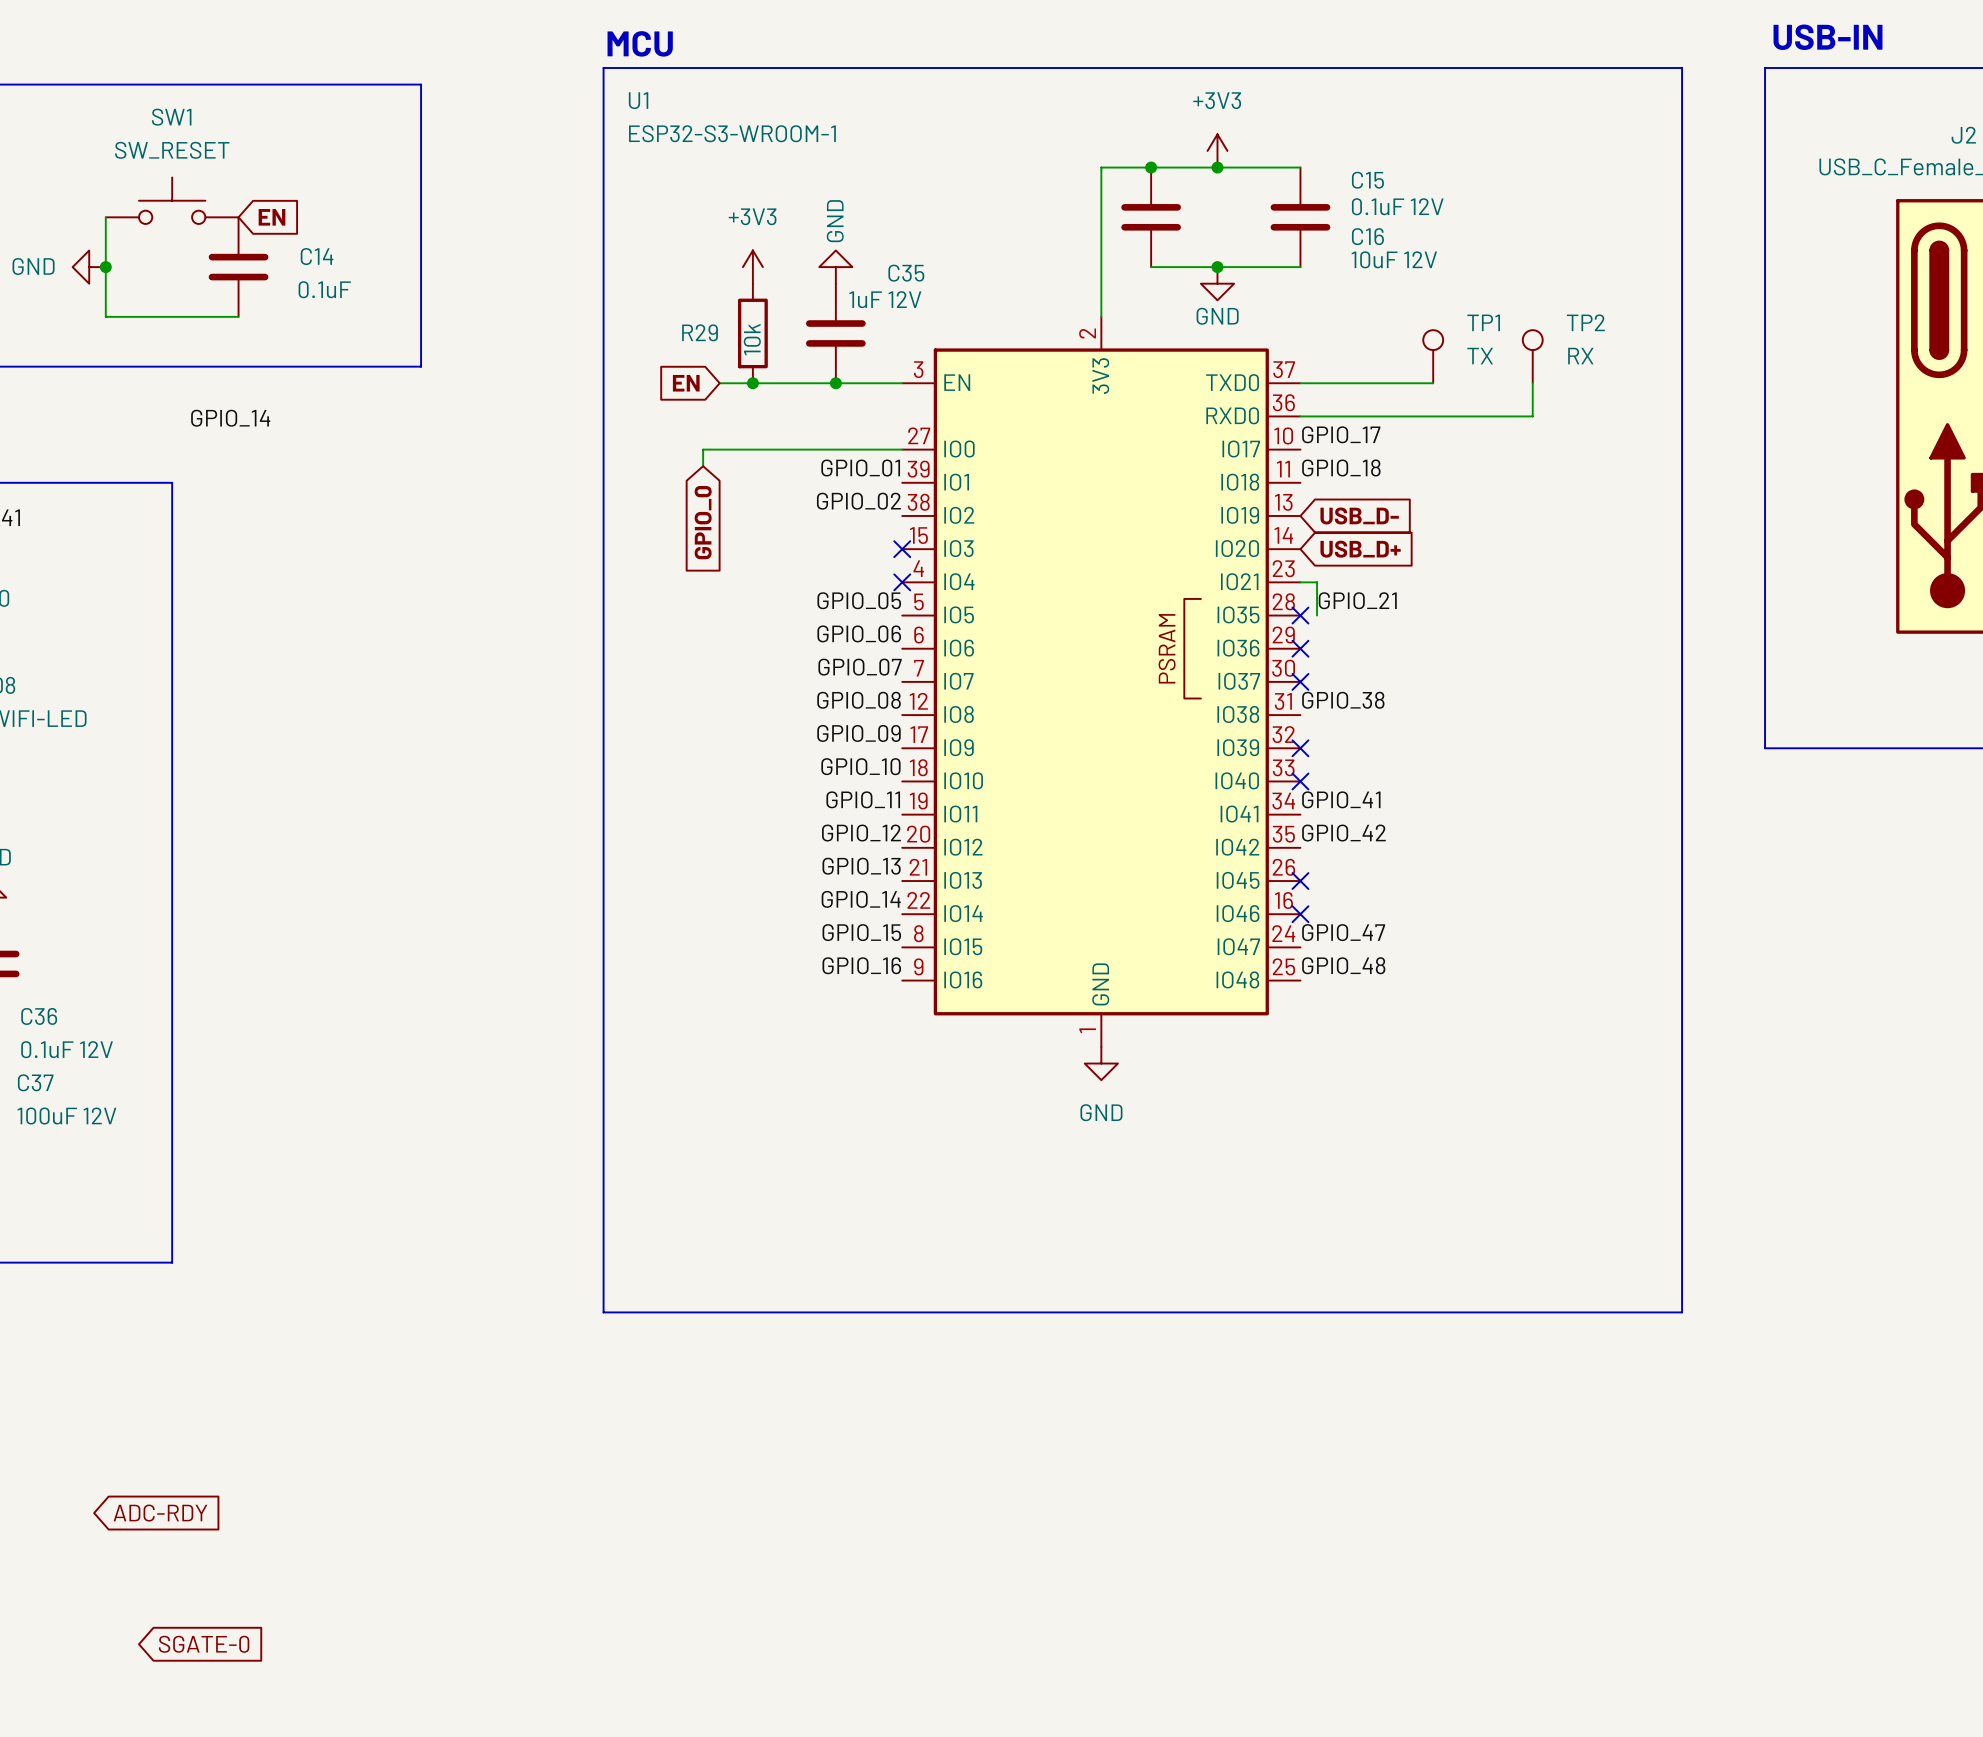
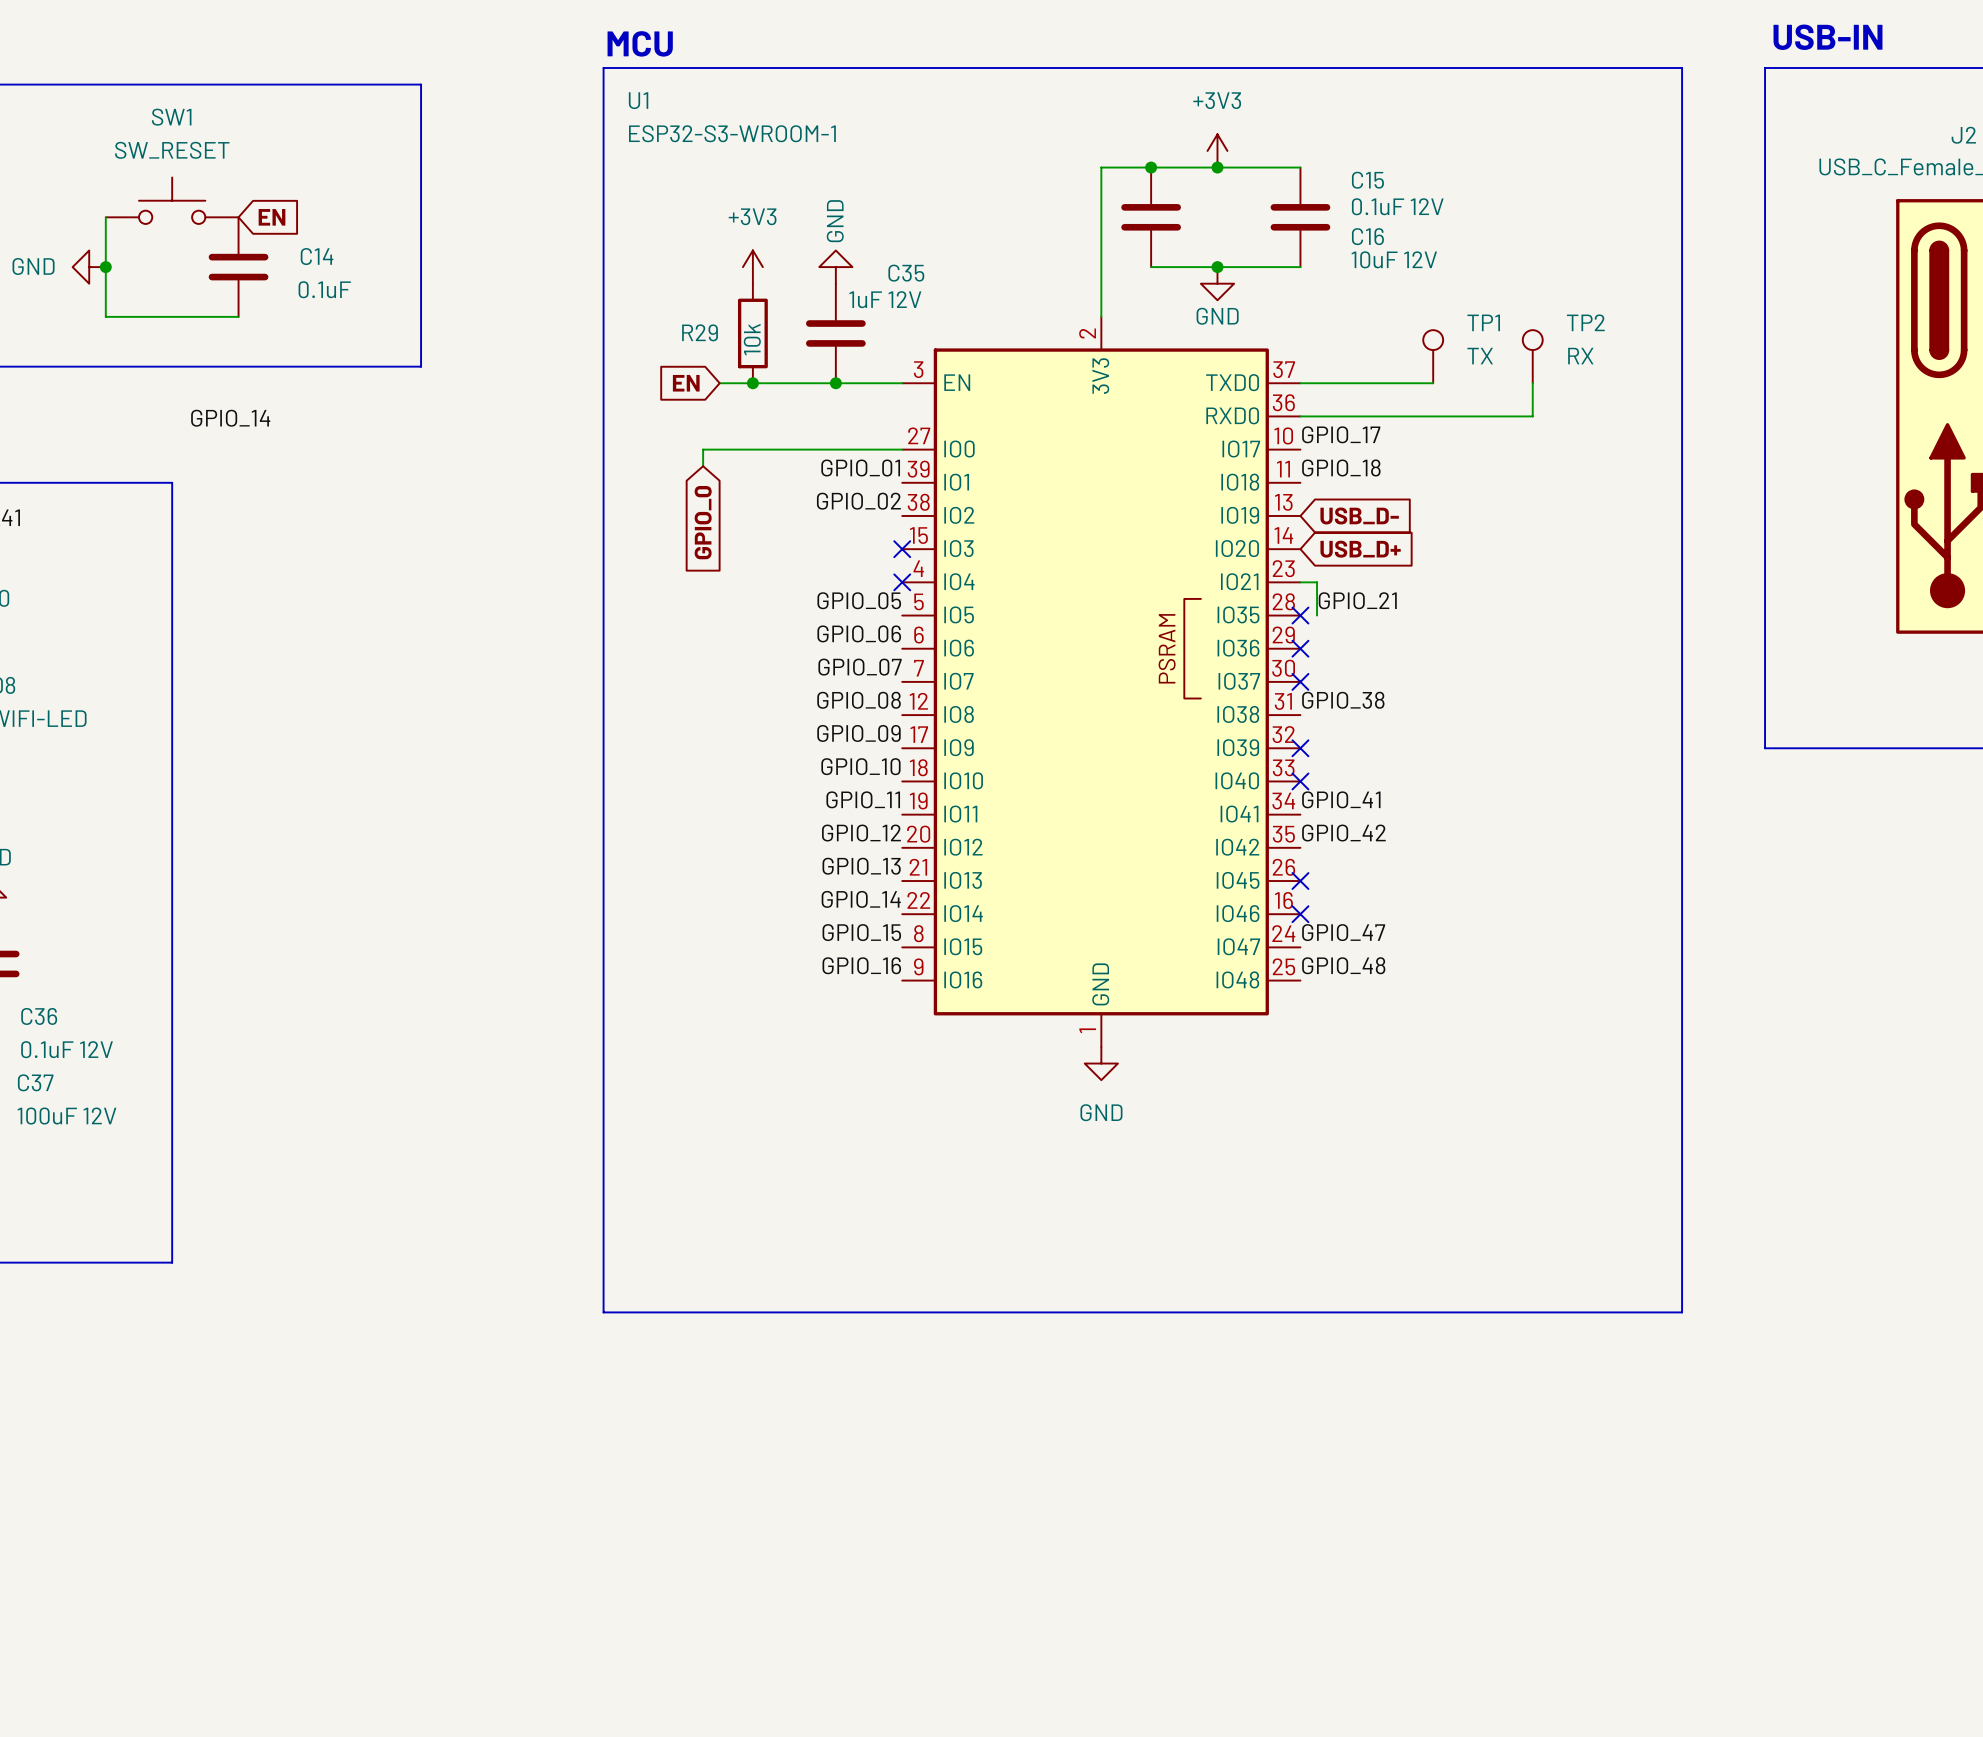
global label: ADC-RDY (160, 1513) -> none
global label: SGATE-0 (204, 1644) -> none

